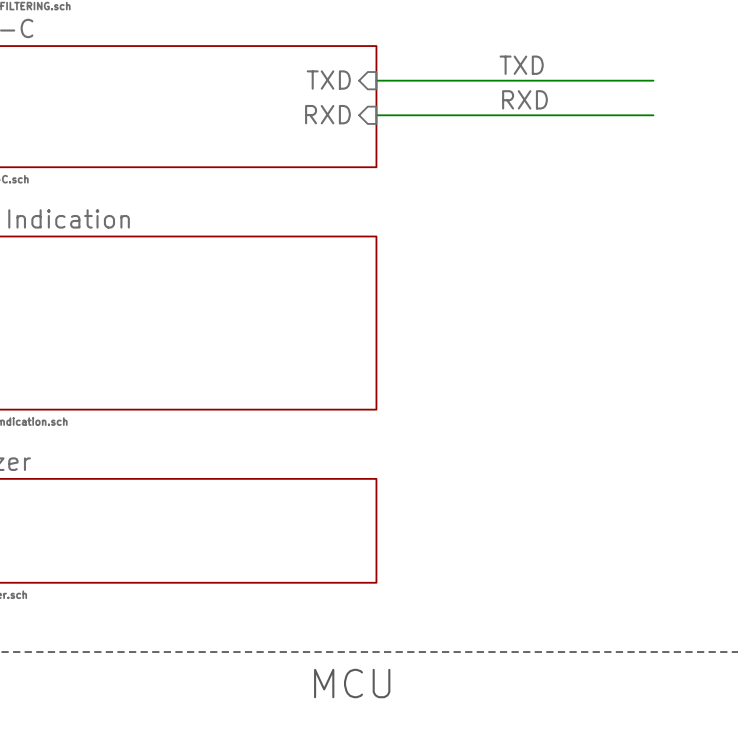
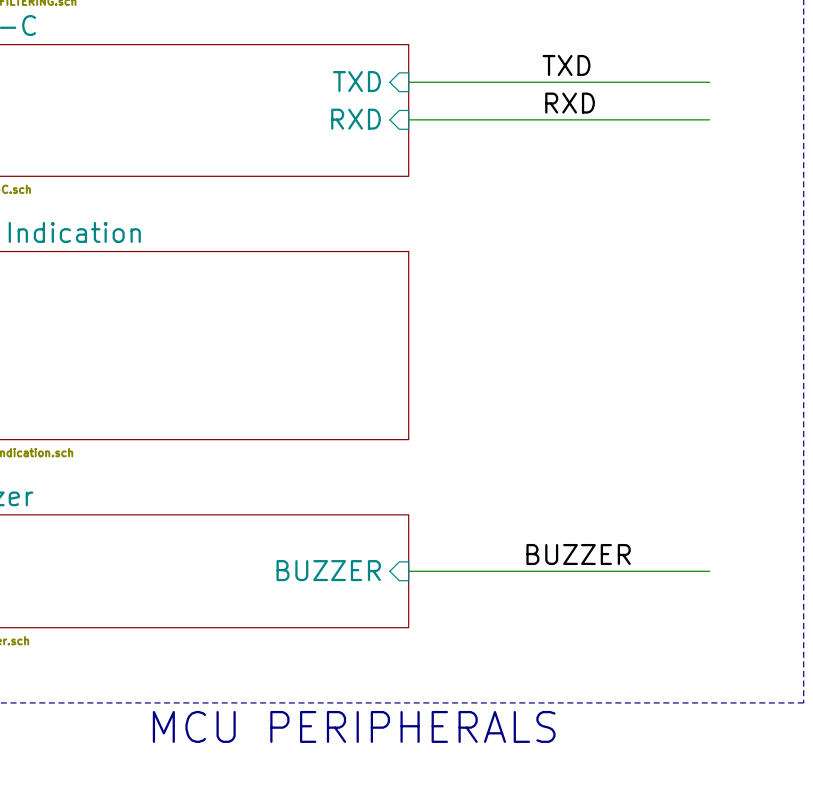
label: none -> BUZZER (578, 554)
sheet pin: none -> BUZZER (328, 570)
wire: none -> (408, 571) (709, 571)
text: none -> MCU PERIPHERALS (354, 726)
text: MCU (352, 683) -> none

